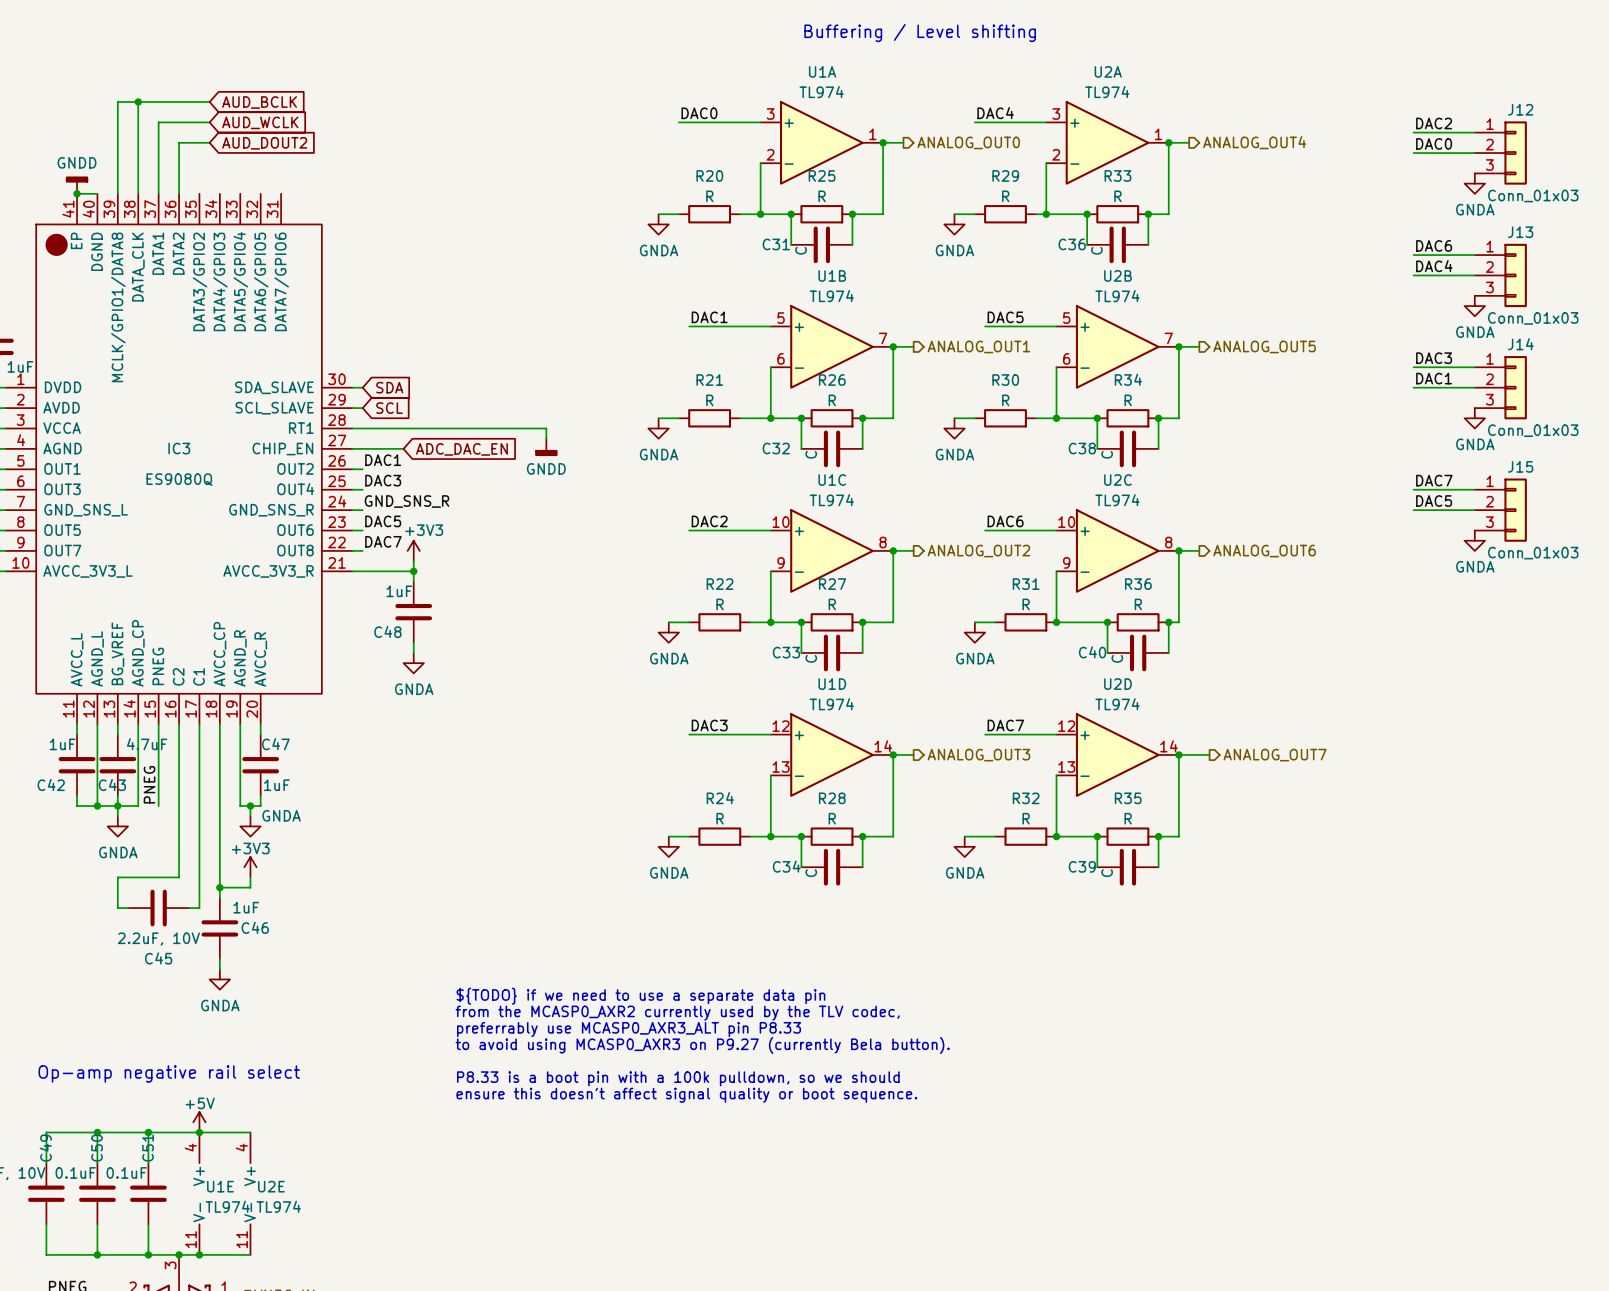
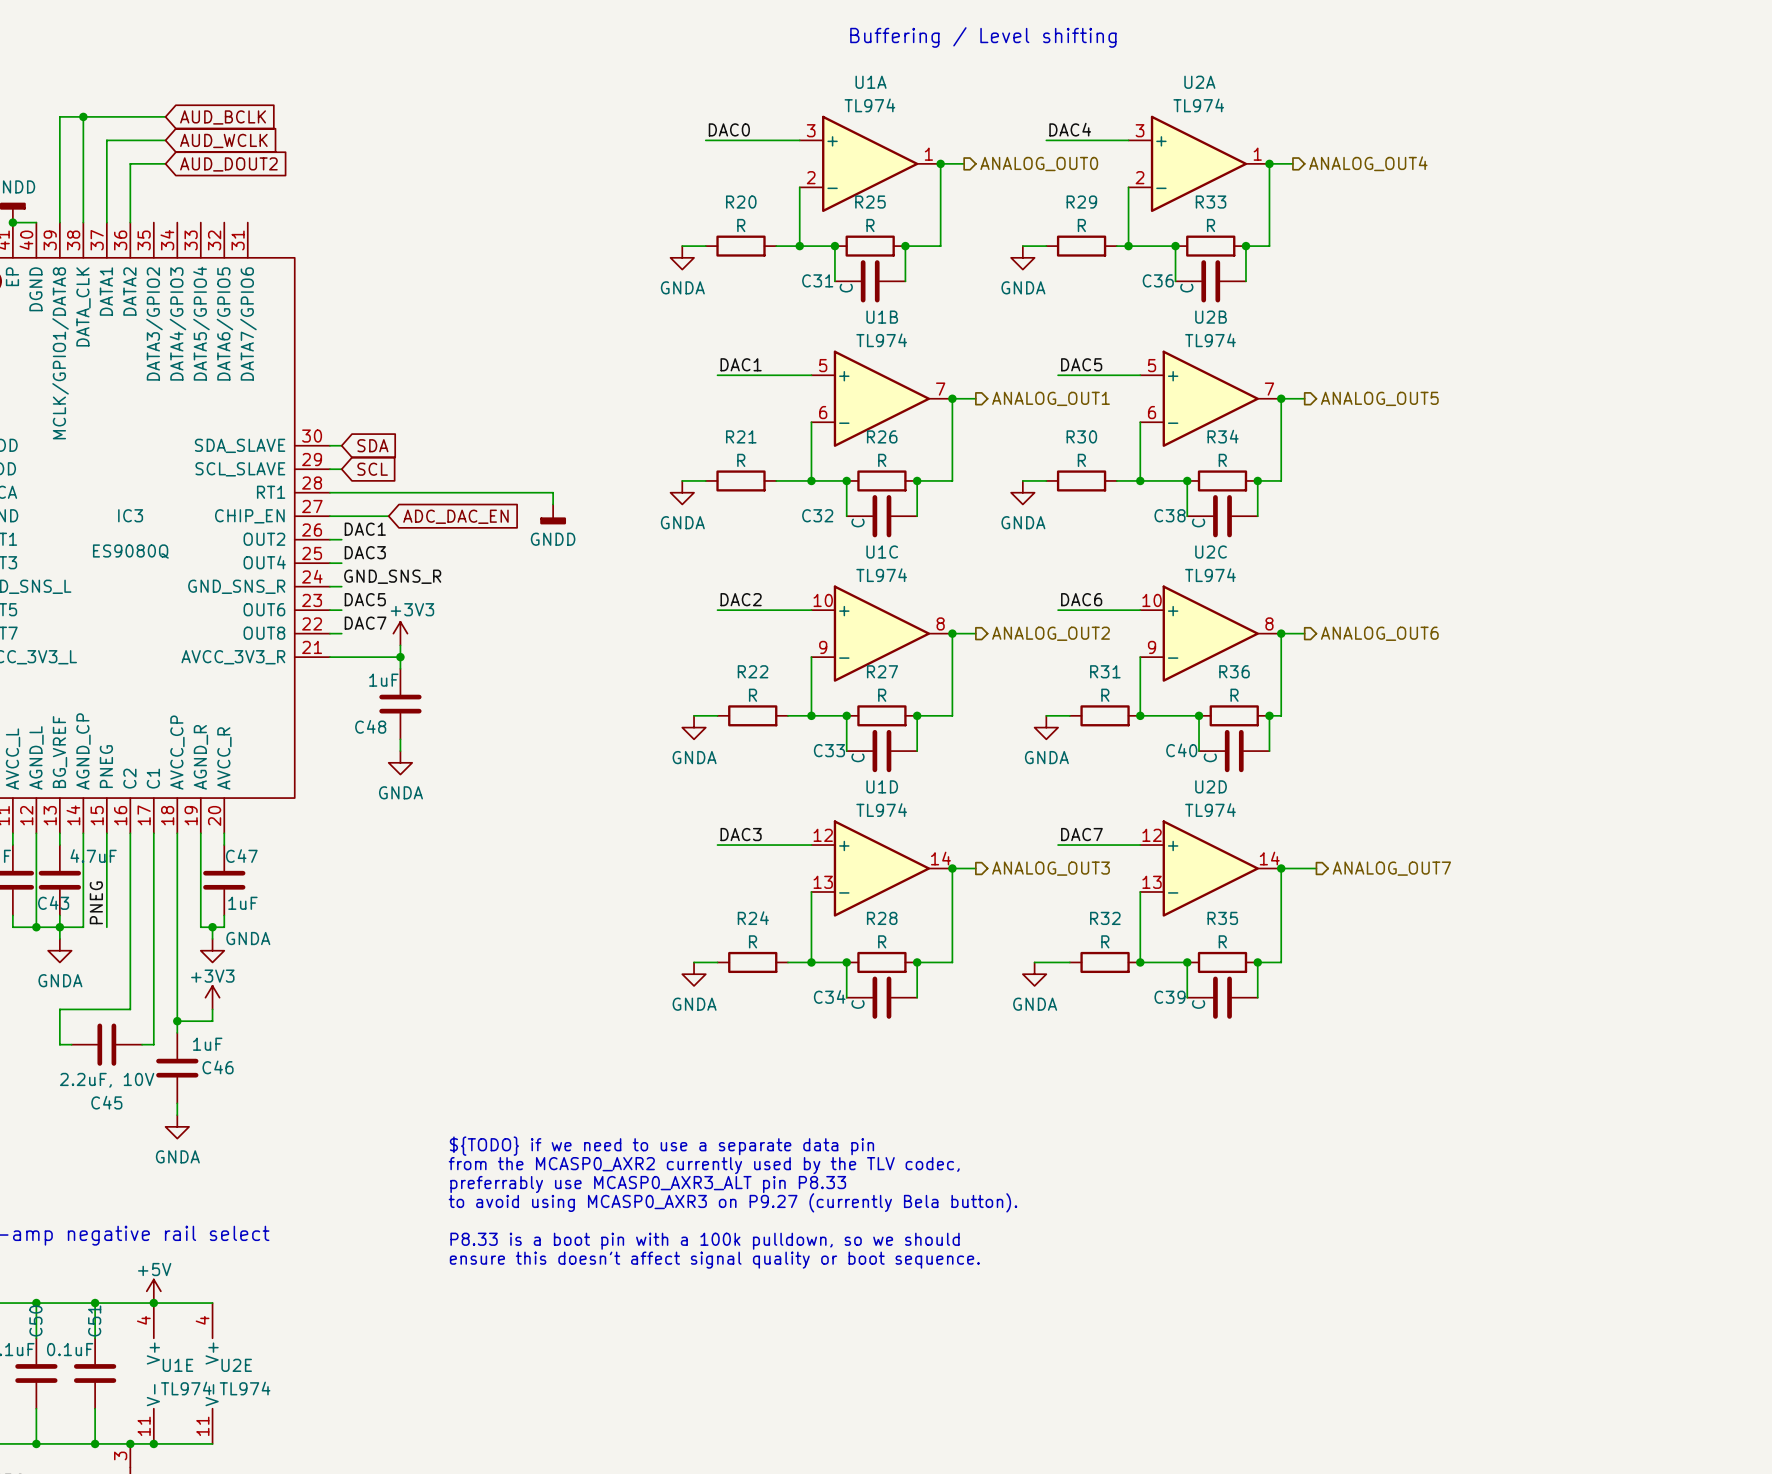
label: DAC2 (1434, 123) -> none
wire: (1413, 132) (1474, 132) -> none
label: DAC0 (1434, 143) -> none
wire: (1413, 153) (1474, 153) -> none
J12: Conn_01x03 (1500, 153) -> none
power symbol: GNDA (1474, 183) -> none
label: DAC6 (1434, 245) -> none
wire: (1413, 255) (1474, 255) -> none
label: DAC4 (1434, 266) -> none
wire: (1413, 275) (1474, 275) -> none
J13: Conn_01x03 (1500, 275) -> none
power symbol: GNDA (1474, 306) -> none
label: DAC3 (1434, 358) -> none
wire: (1413, 367) (1474, 367) -> none
label: DAC1 (1434, 378) -> none
wire: (1413, 387) (1474, 387) -> none
J14: Conn_01x03 (1500, 387) -> none
power symbol: GNDA (1474, 418) -> none
label: DAC7 (1434, 480) -> none
wire: (1413, 489) (1474, 489) -> none
label: DAC5 (1434, 501) -> none
wire: (1413, 510) (1474, 510) -> none
J15: Conn_01x03 (1500, 510) -> none
power symbol: GNDA (1474, 540) -> none

